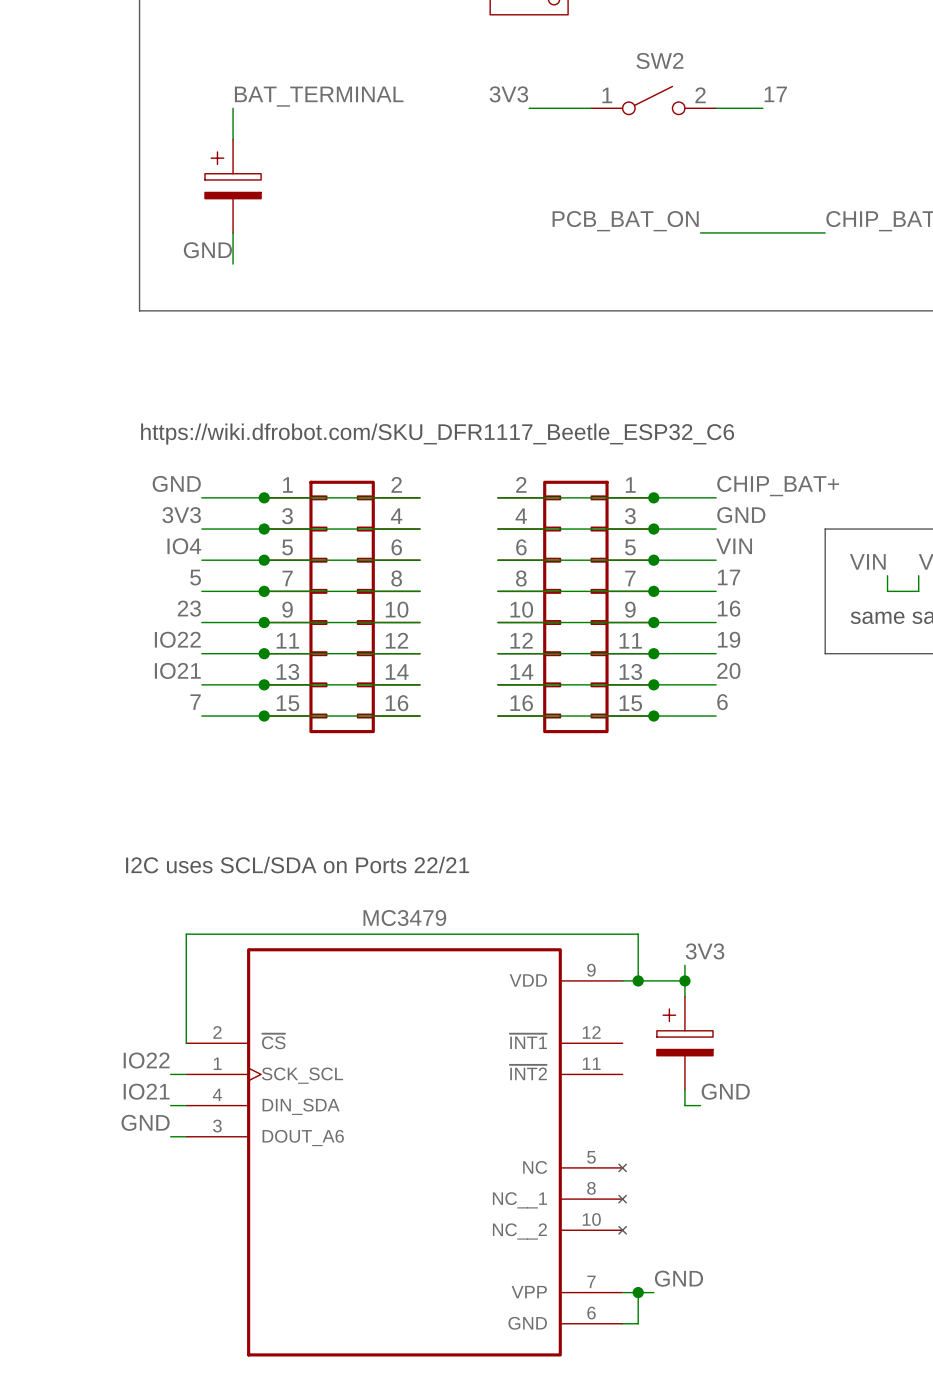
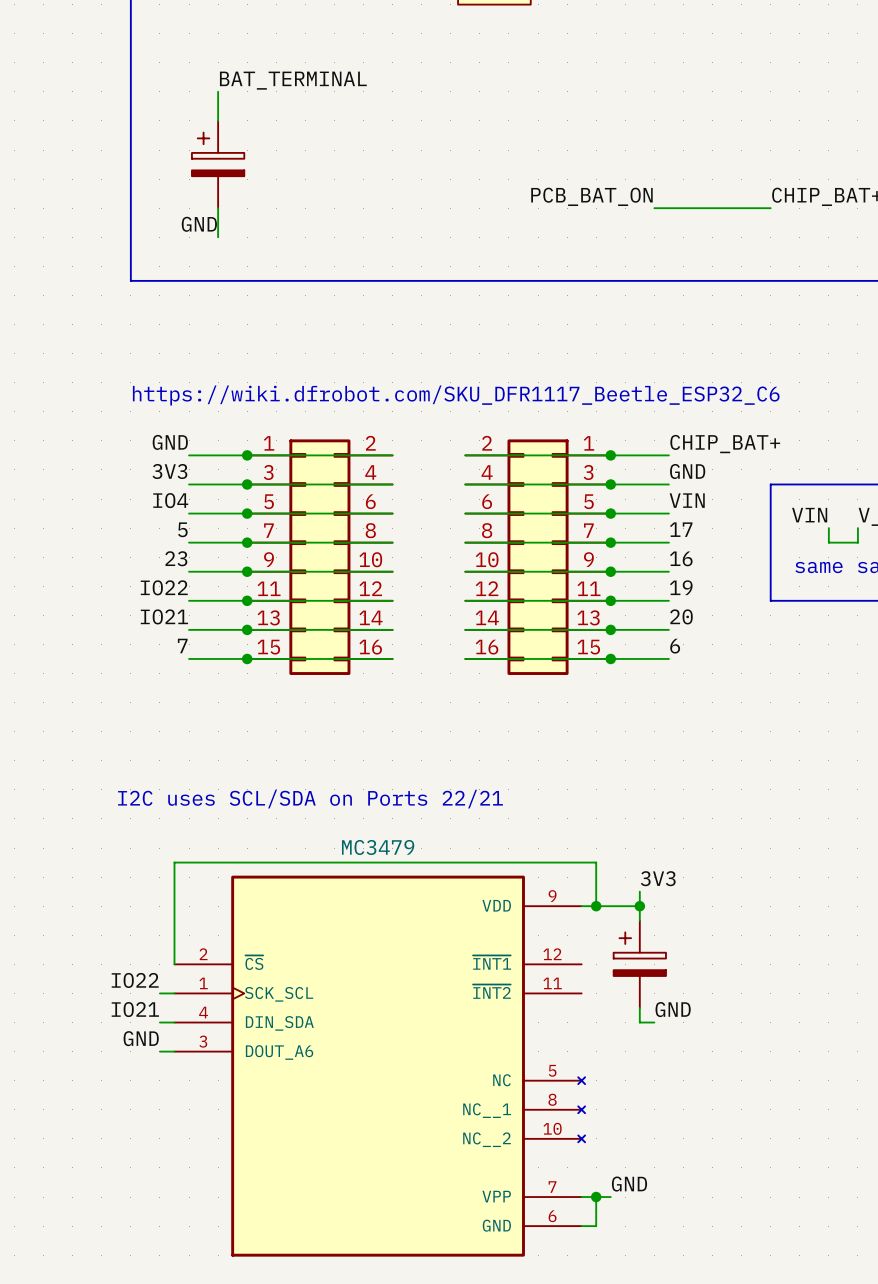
label: 3V3 (508, 94) -> none
label: 17 (775, 94) -> none
SW2: (653, 100) -> none
wire: (529, 108) (591, 108) -> none
wire: (716, 108) (762, 108) -> none

